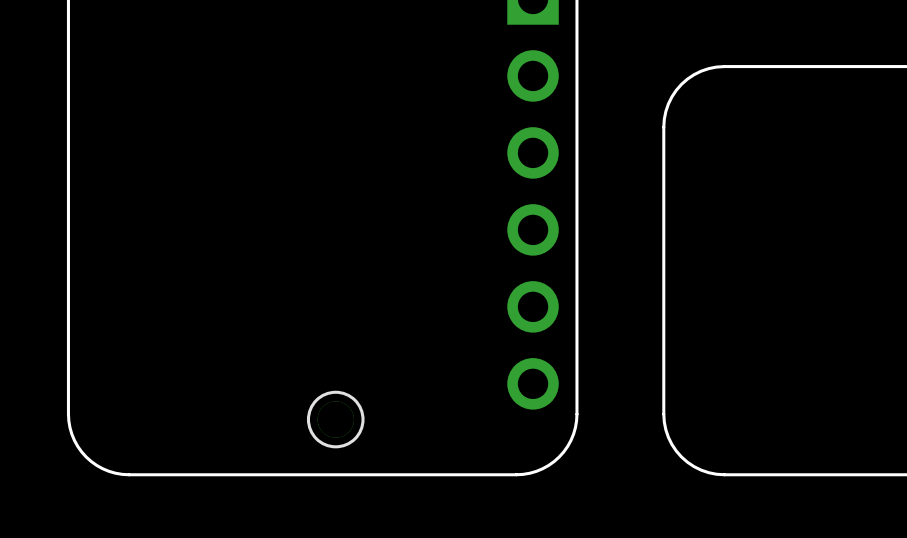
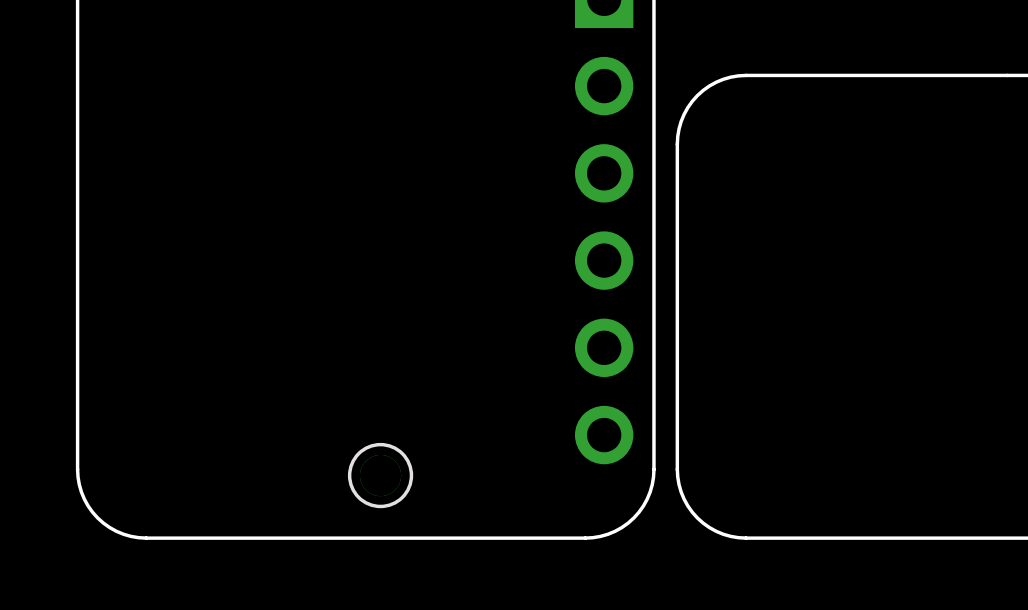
board edge: (724, 66) (701, 71) (681, 84) (668, 103) (663, 127) (664, 422) (671, 444) (687, 462) (708, 472) (724, 474) -> (821, 75) (738, 75) (716, 82) (703, 90) (687, 107) (681, 121) (677, 144) (677, 469) (681, 492) (687, 505) (697, 518) (709, 527) (723, 534) (746, 538) (821, 538)

